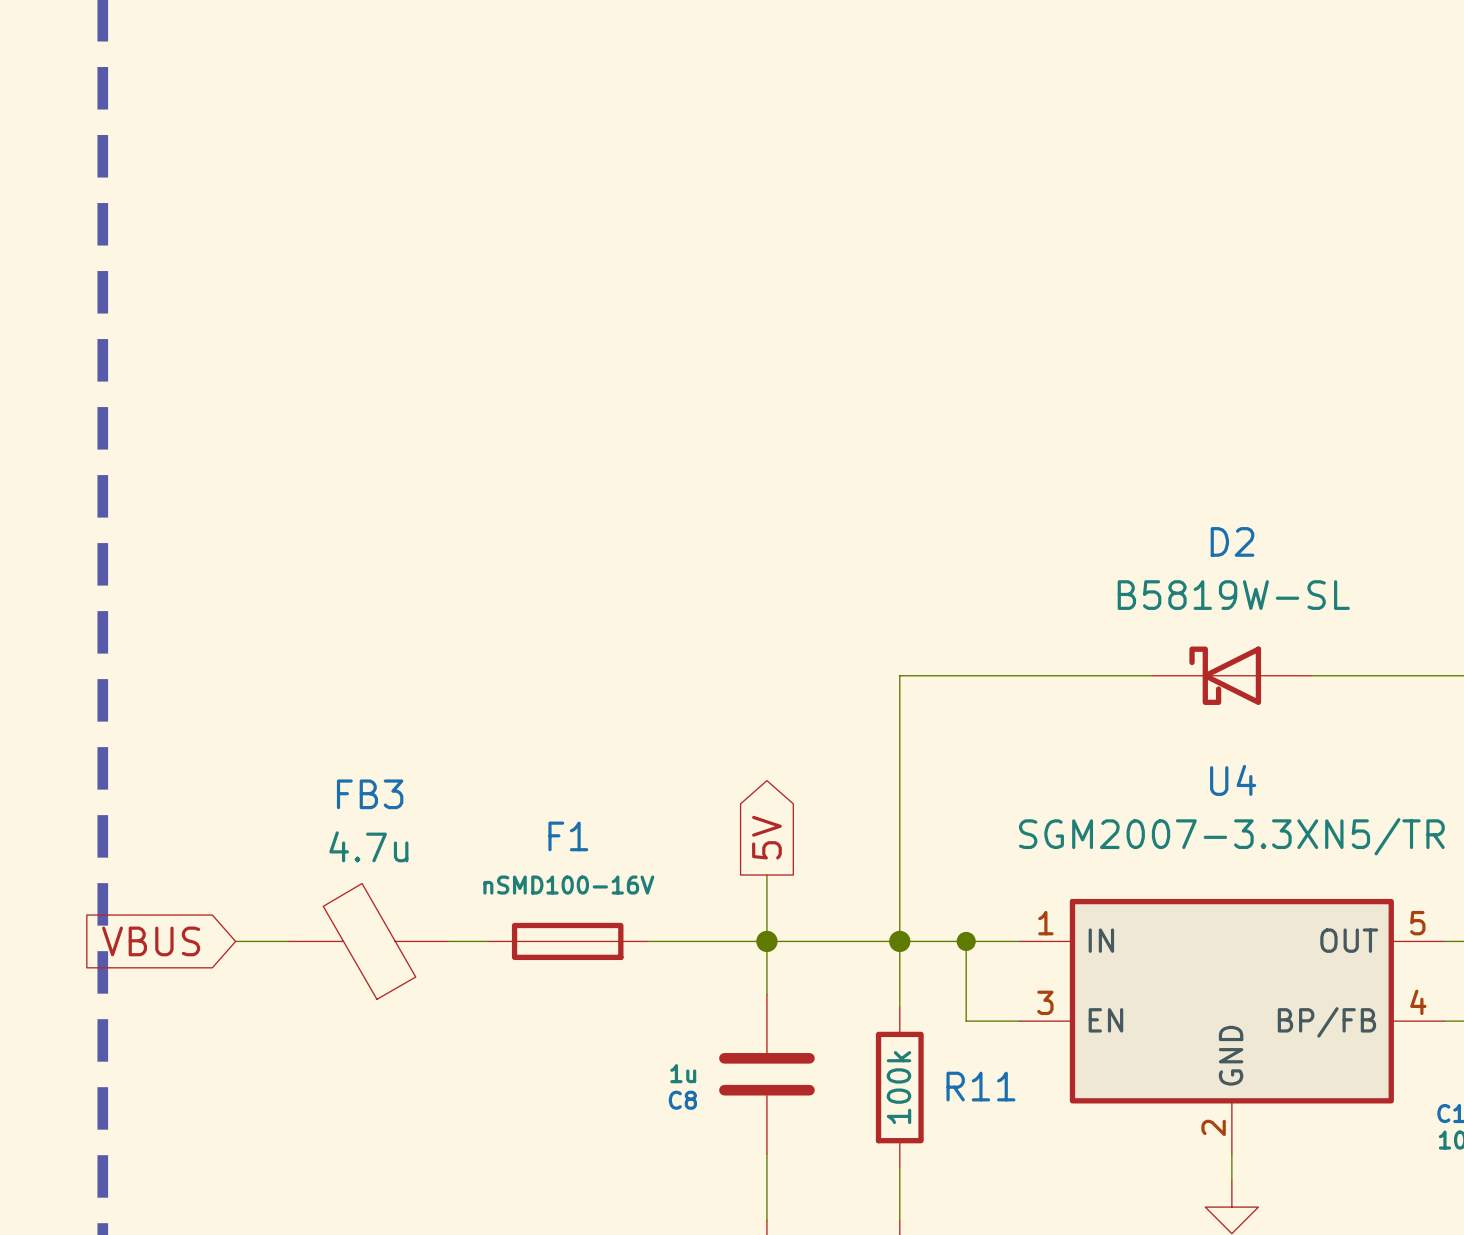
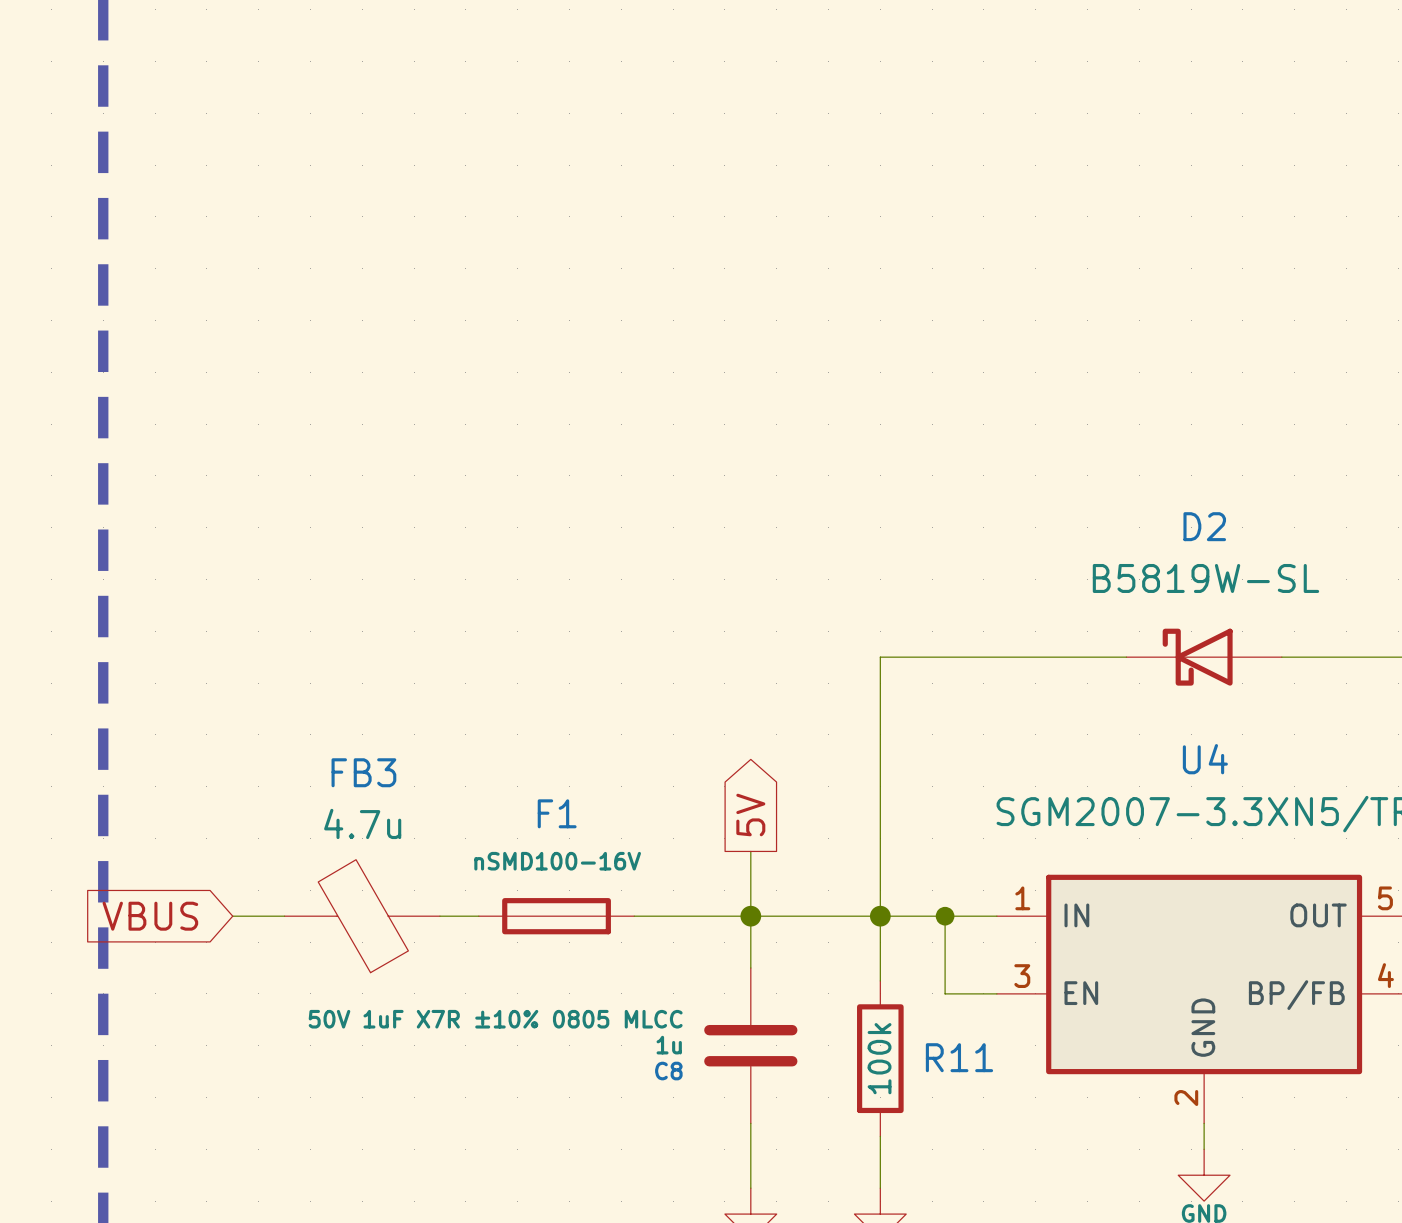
C8 text: none -> 50V 1uF X7R ±10% 0805 MLCC (495, 1019)

